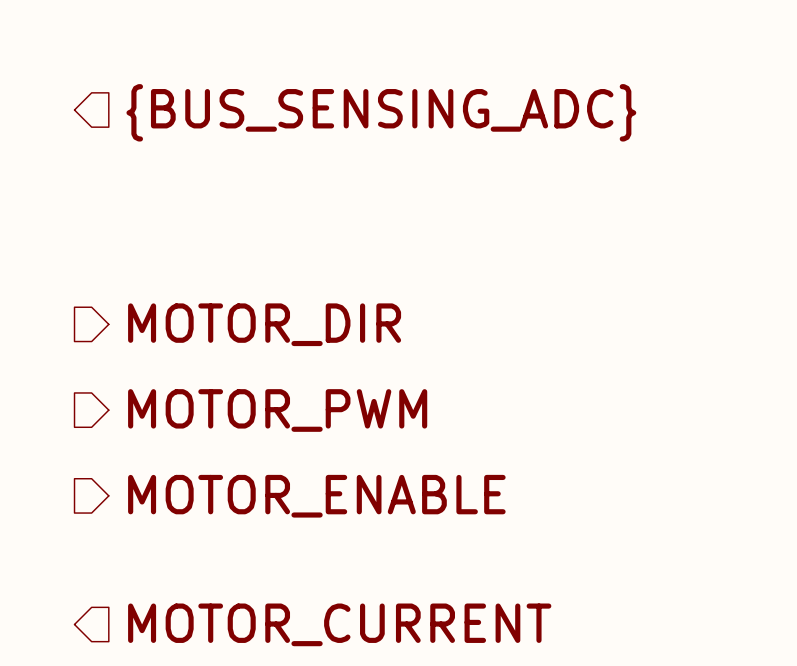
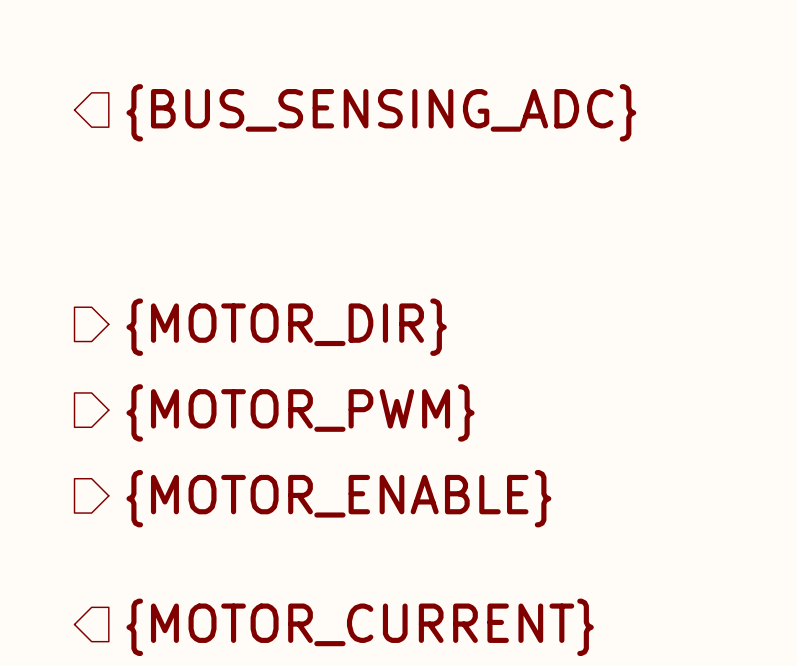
hierarchical label: MOTOR_DIR (264, 324) -> {MOTOR_DIR} (286, 327)
hierarchical label: MOTOR_PWM (277, 410) -> {MOTOR_PWM} (300, 412)
hierarchical label: MOTOR_ENABLE (316, 496) -> {MOTOR_ENABLE} (338, 498)
hierarchical label: MOTOR_CURRENT (339, 624) -> {MOTOR_CURRENT} (360, 627)

